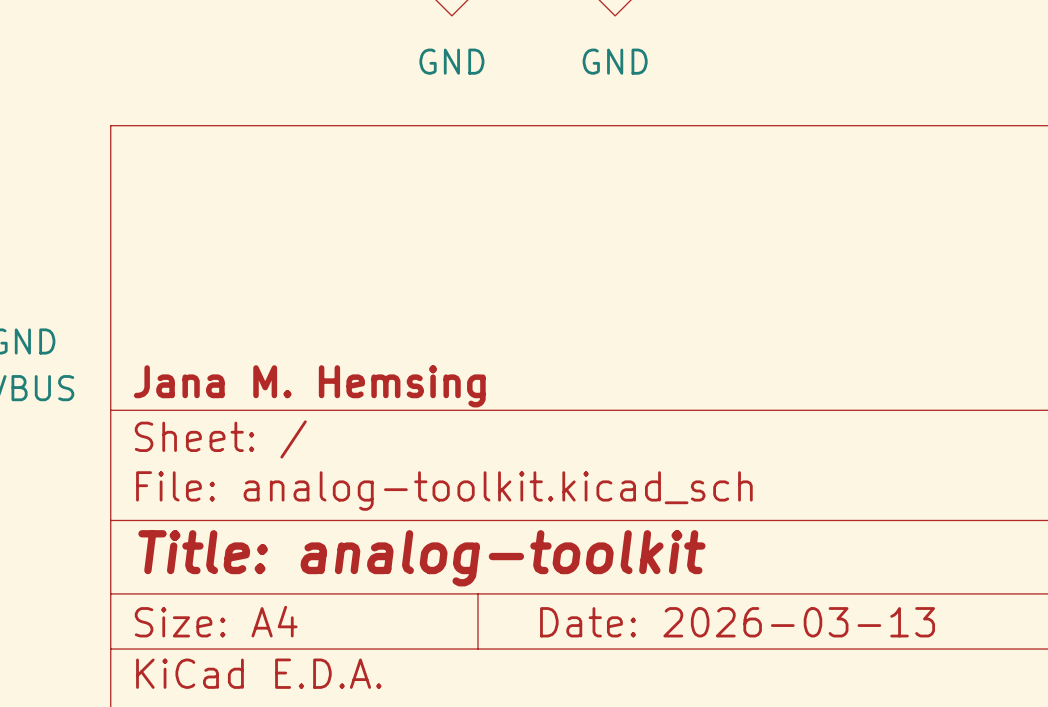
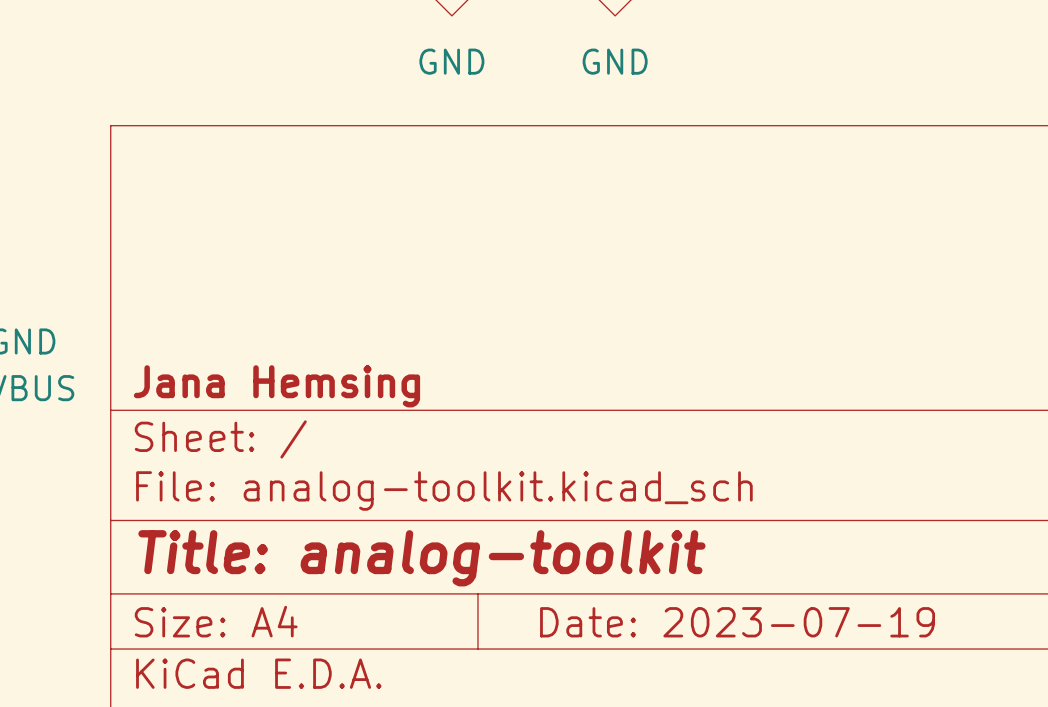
title block: Jana M. Hemsing (309, 386) -> Jana Hemsing (276, 386)
title block: Date: 2026-03-13 (737, 622) -> Date: 2023-07-19 (737, 622)

